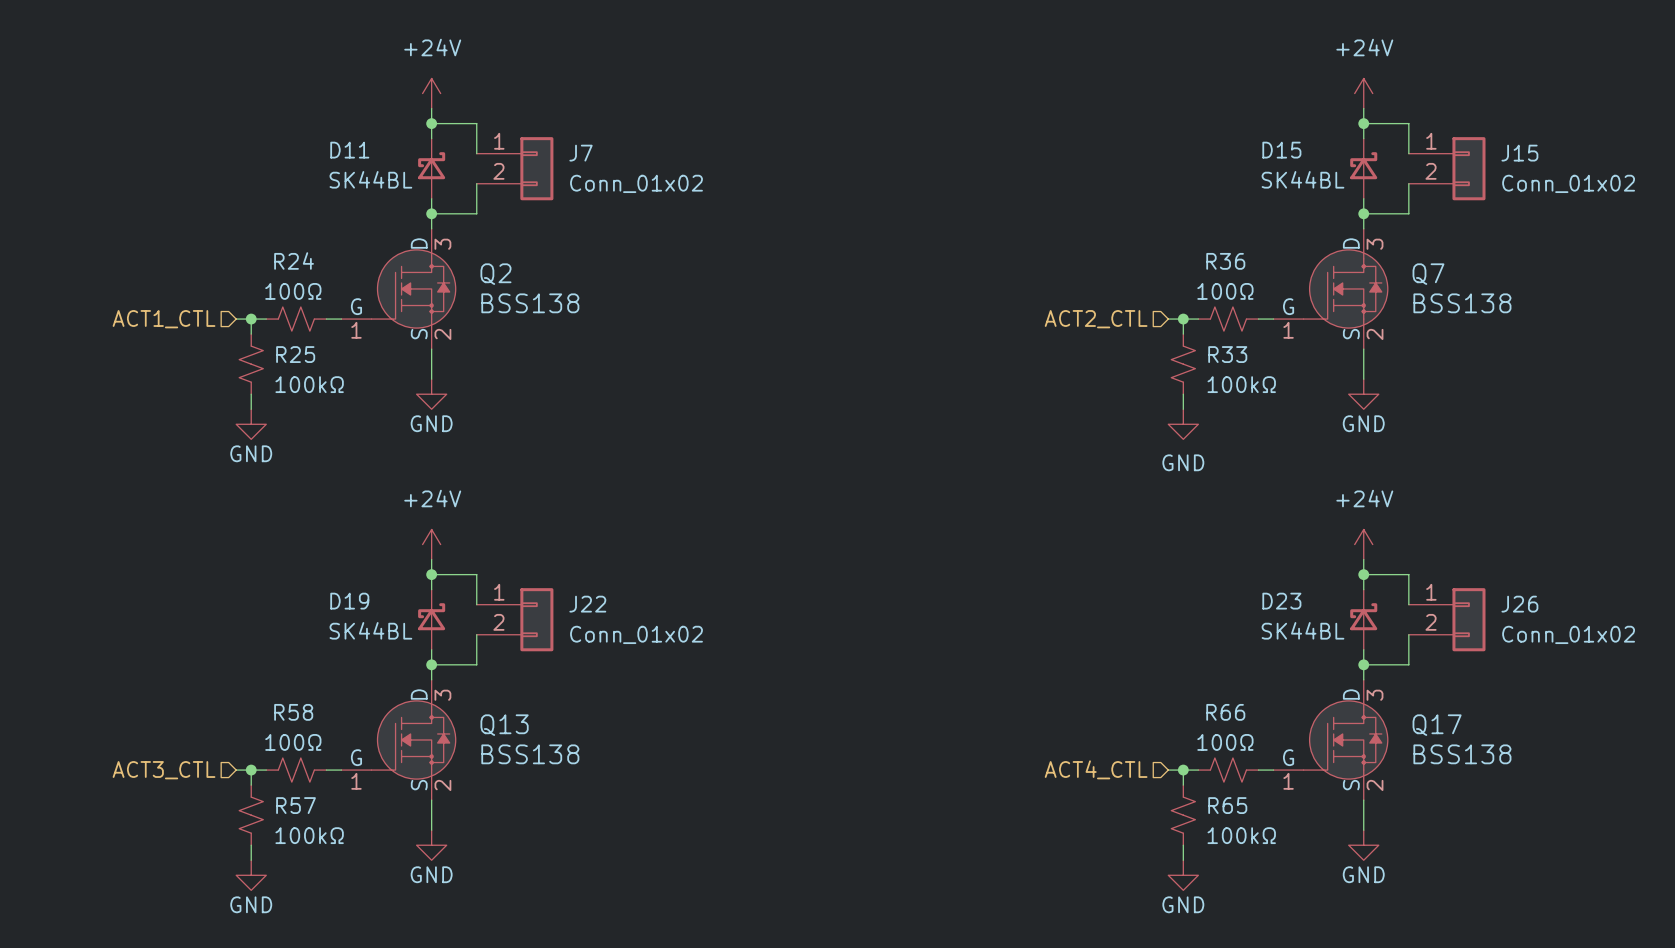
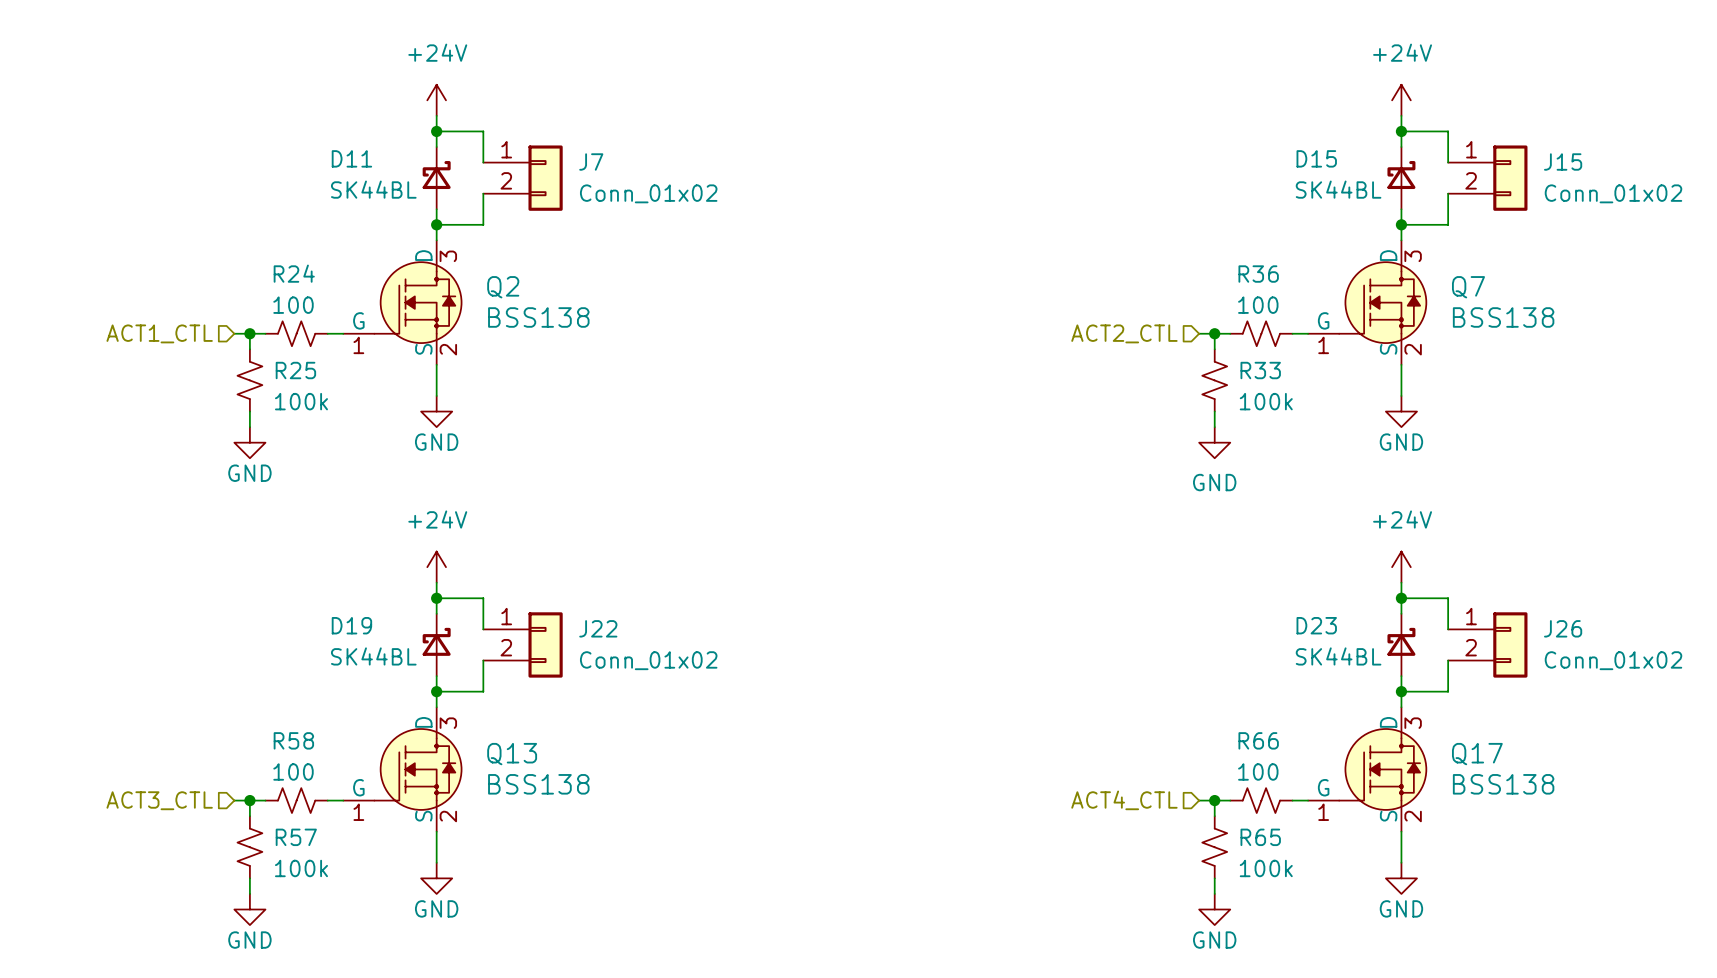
R24 value: 100Ω (293, 291) -> 100 (293, 305)
R36 value: 100Ω (1225, 291) -> 100 (1258, 305)
R25 value: 100kΩ (309, 384) -> 100k (301, 401)
R33 value: 100kΩ (1241, 384) -> 100k (1266, 401)
R58 value: 100Ω (293, 742) -> 100 (293, 771)
R66 value: 100Ω (1225, 742) -> 100 (1258, 771)
R57 value: 100kΩ (309, 835) -> 100k (301, 868)
R65 value: 100kΩ (1241, 835) -> 100k (1266, 868)

